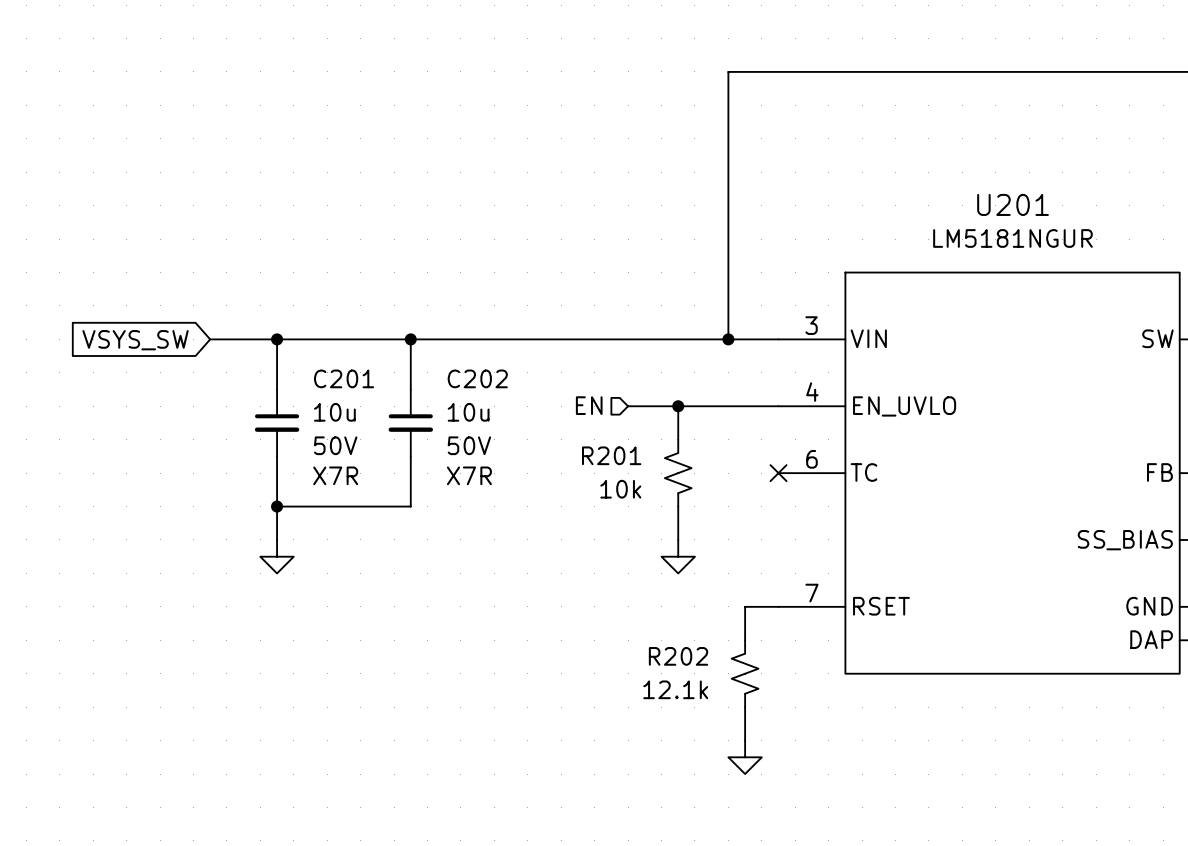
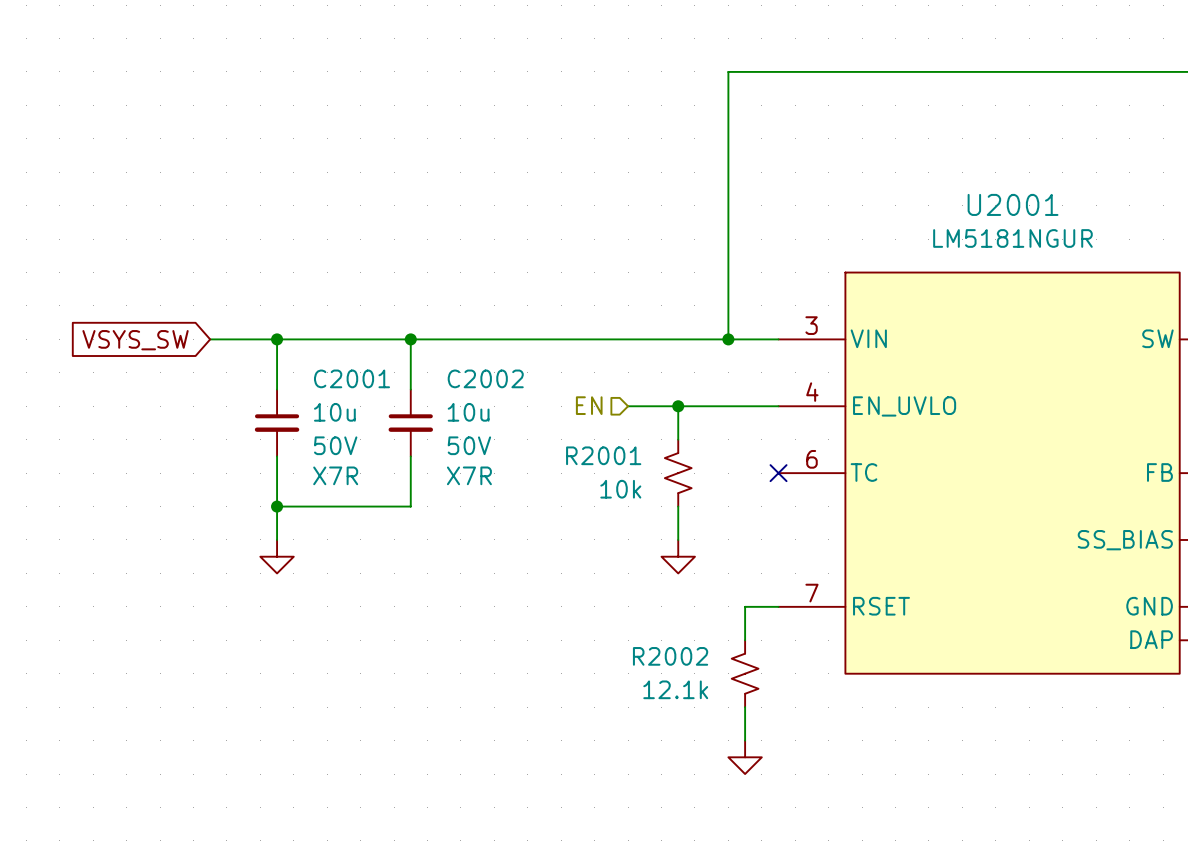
U201 name: U201 (1013, 204) -> U2001 (1013, 204)
C201 name: C201 (344, 378) -> C2001 (352, 378)
C202 name: C202 (477, 378) -> C2002 (485, 378)
R201 name: R201 (611, 455) -> R2001 (603, 455)
R202 name: R202 (678, 656) -> R2002 (670, 656)

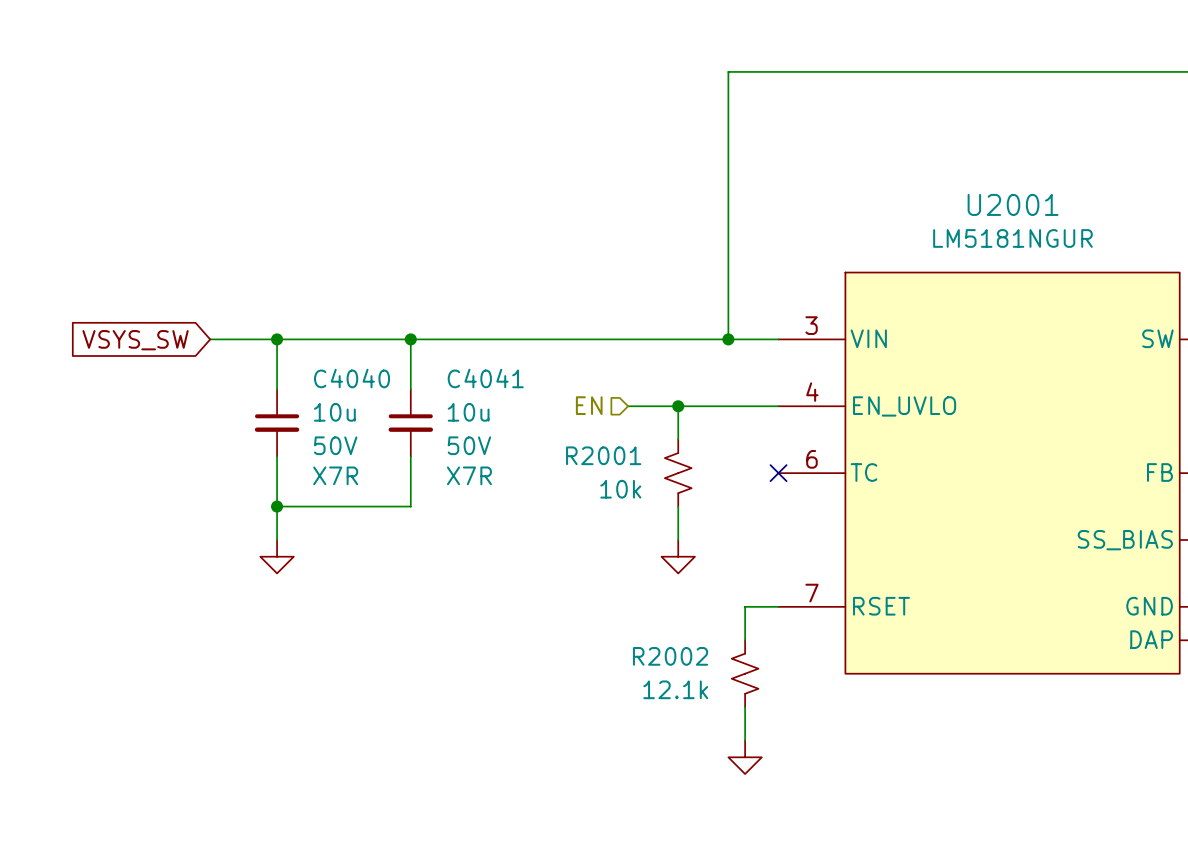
C2001 name: C2001 (352, 378) -> C4040 (352, 378)
C2002 name: C2002 (485, 378) -> C4041 (485, 378)

